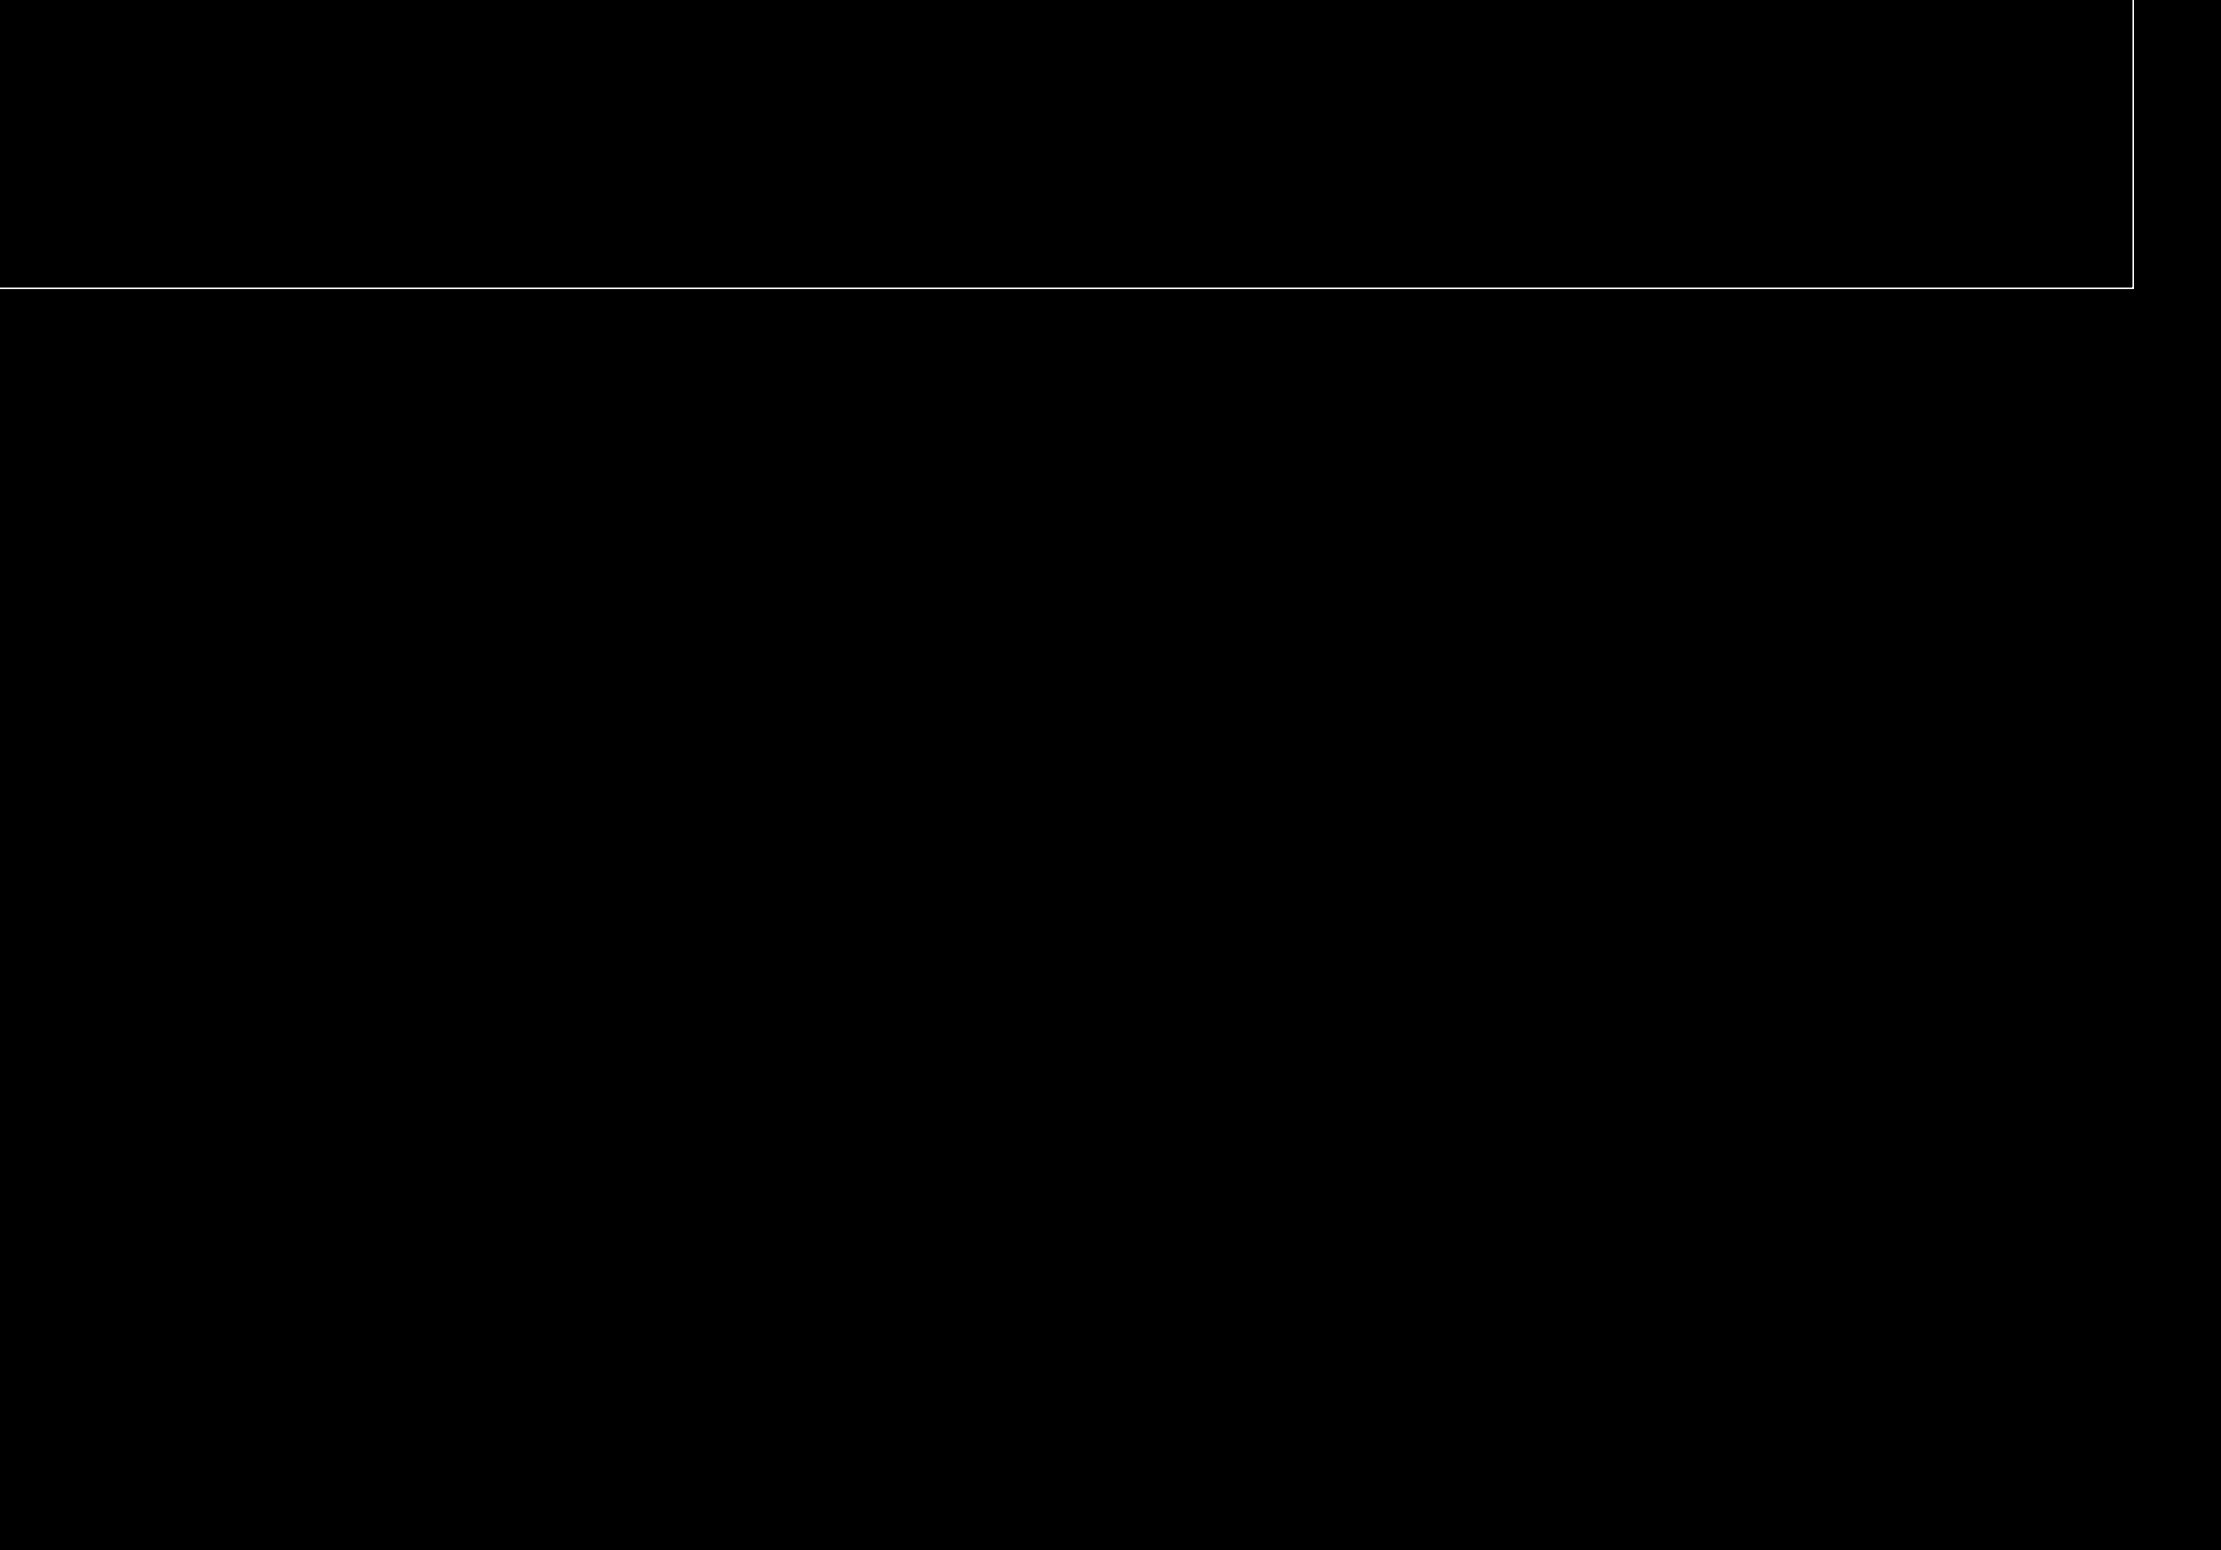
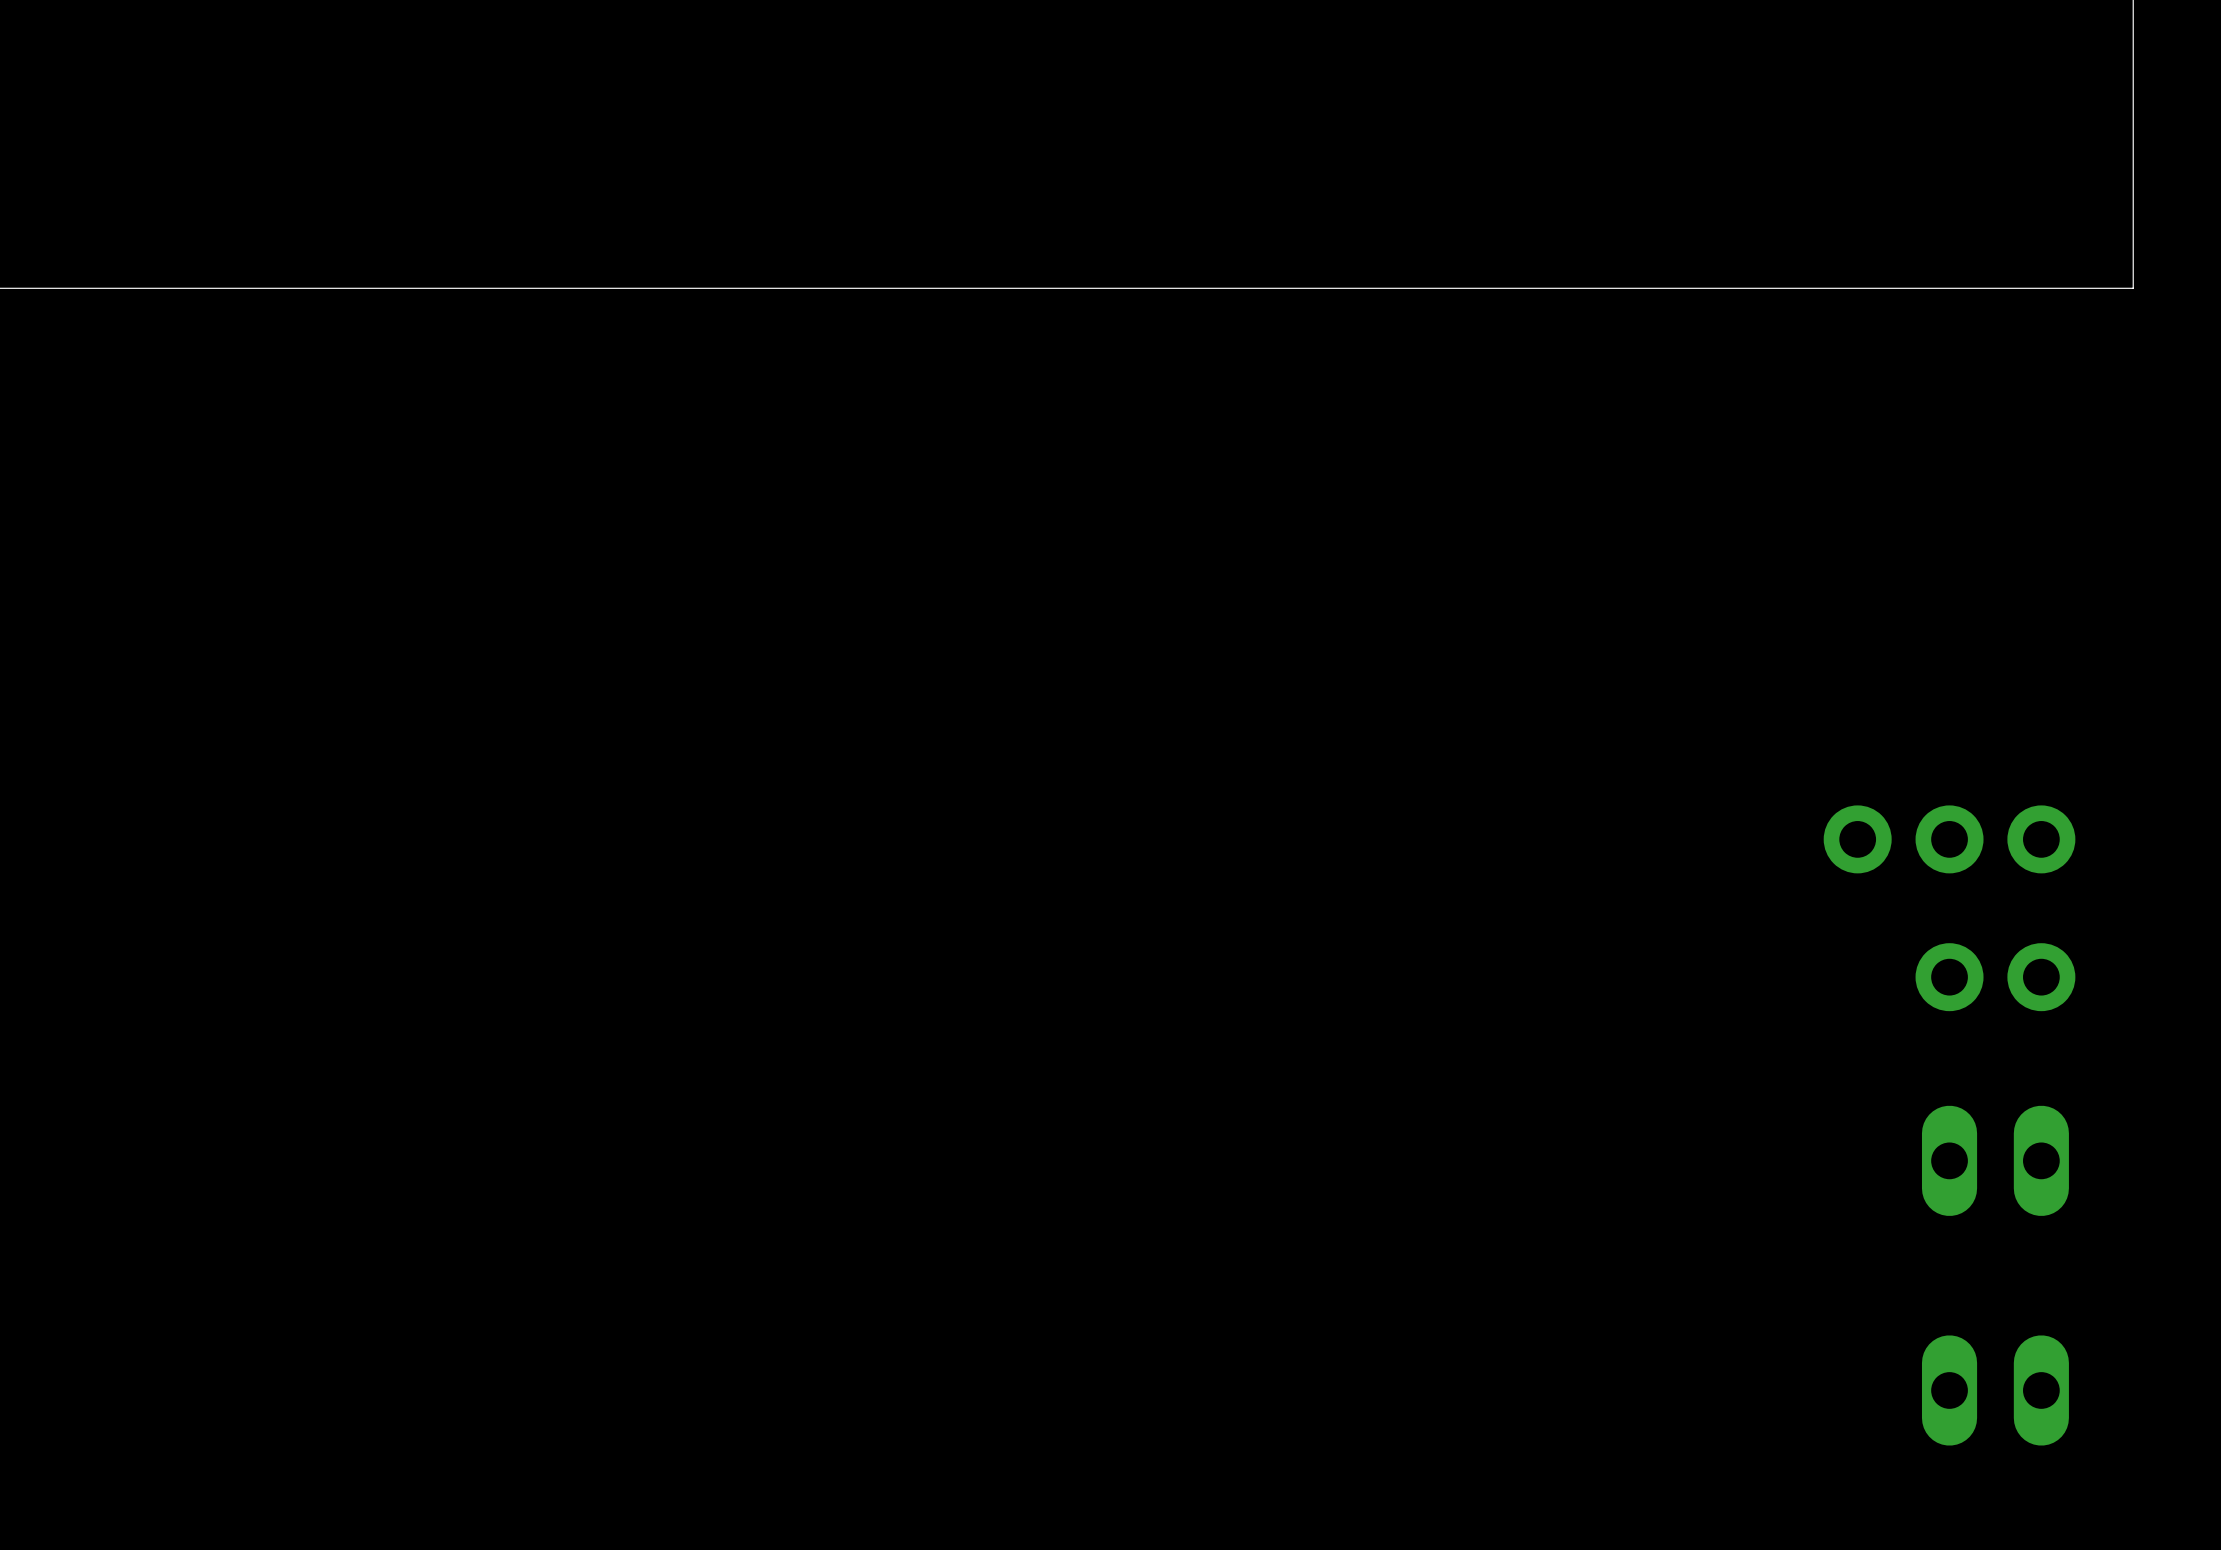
part: none -> (1949, 839)
part: none -> (1995, 977)
part: none -> (1995, 1160)
part: none -> (1995, 1390)

